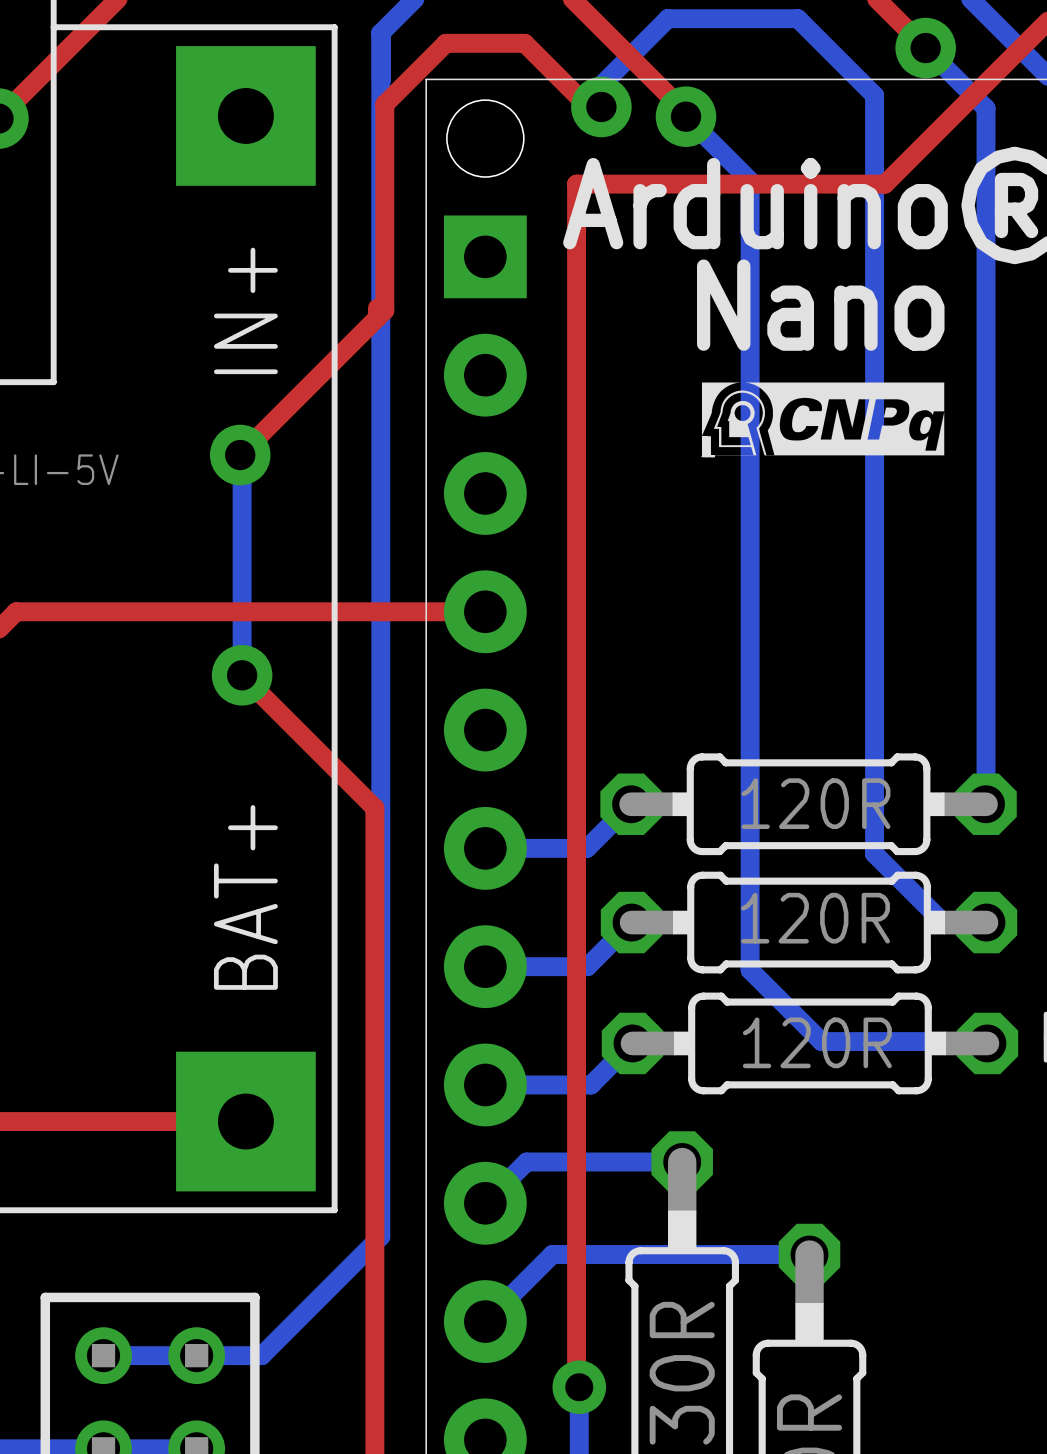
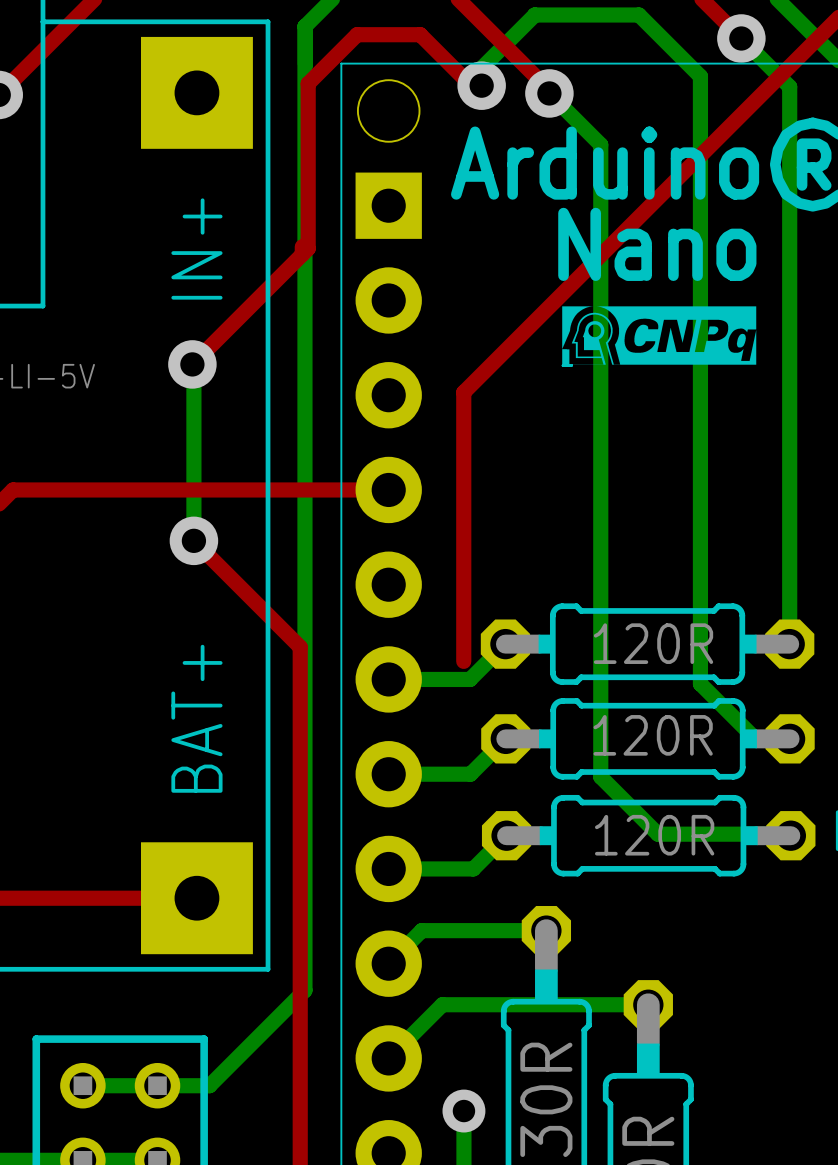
top track: (884, 184) (576, 184) (576, 1384) -> (708, 147) (463, 392) (463, 661)

